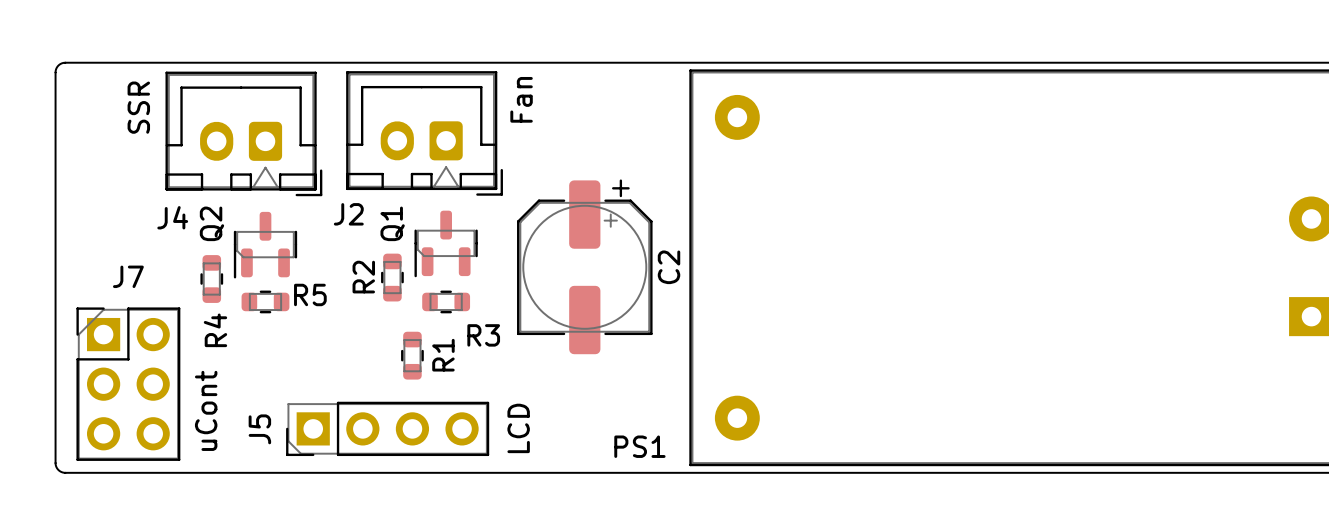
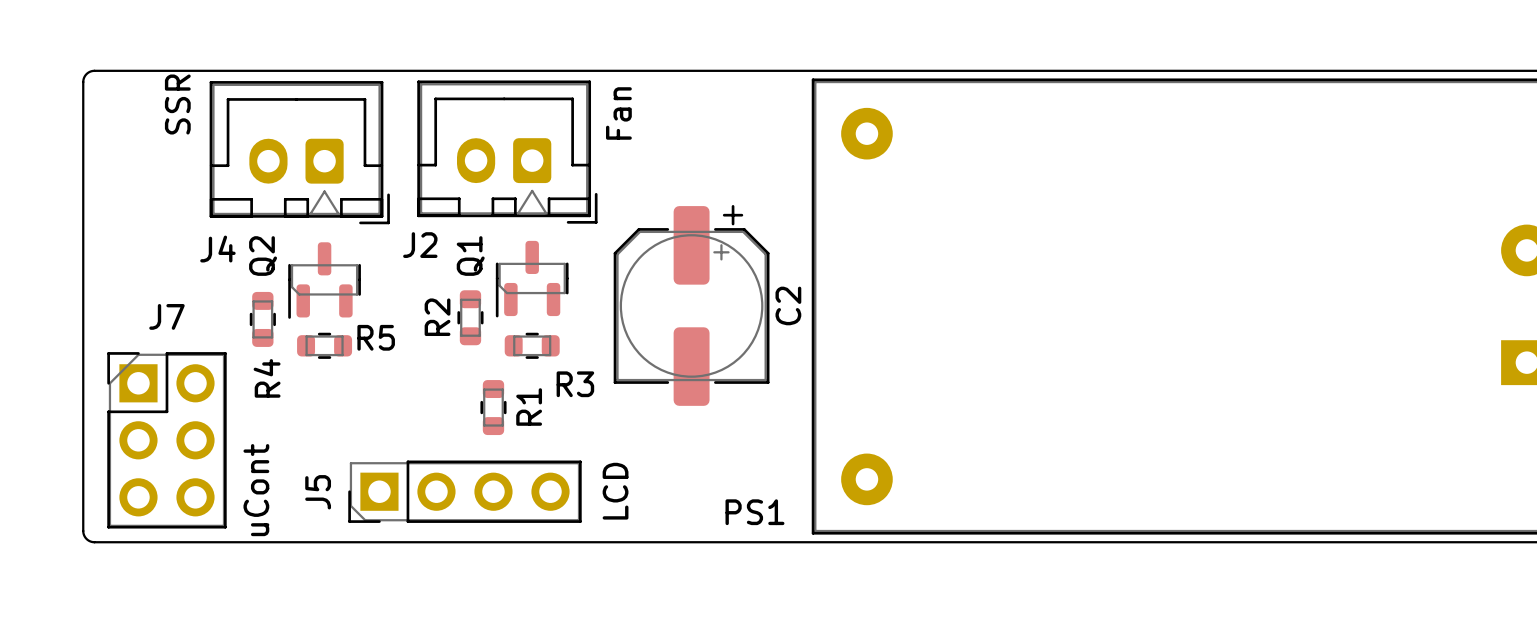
J4 value position: SSR (138, 107) -> SSR (177, 104)
J7 value position: uCont (206, 410) -> uCont (256, 490)

